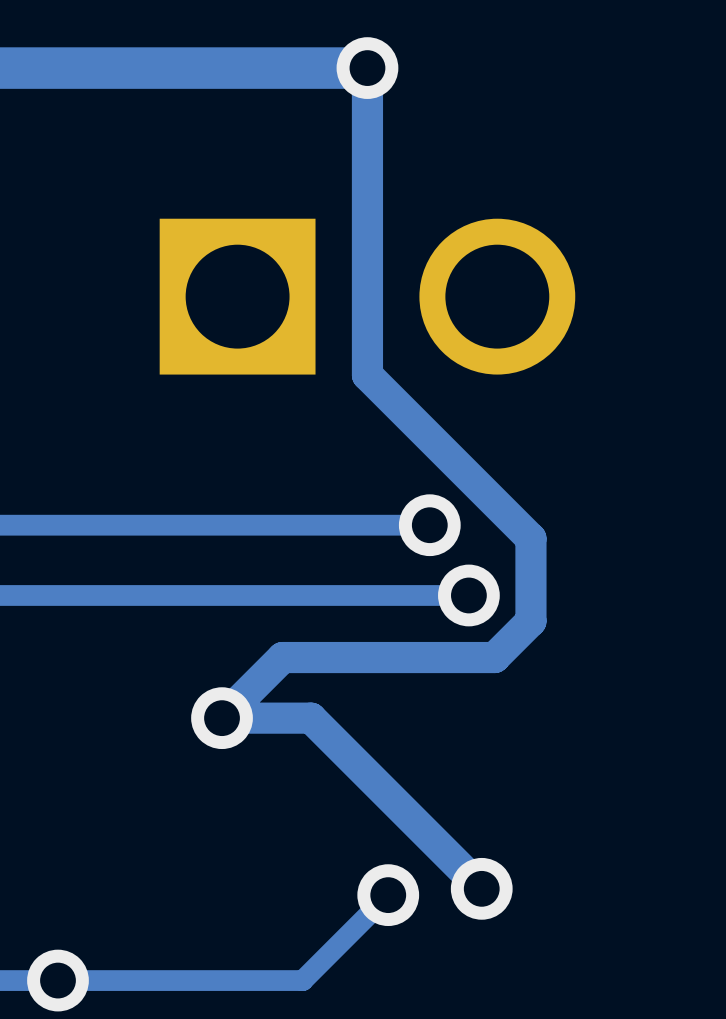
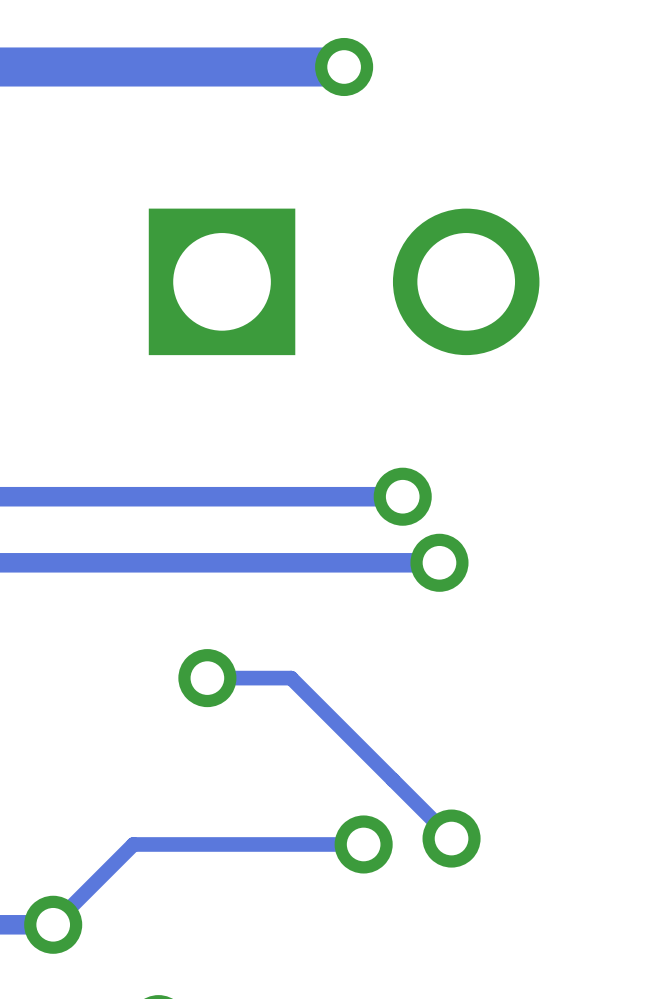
track: (367, 68) (367, 375) (530, 538) (530, 621) (494, 657) (282, 657) (222, 718) -> none
track width: thick (222, 718) (311, 718) (481, 888) -> thin (207, 678) (291, 678) (451, 838)
track: (388, 895) (302, 980) (57, 980) -> (363, 844) (133, 844) (53, 924)

